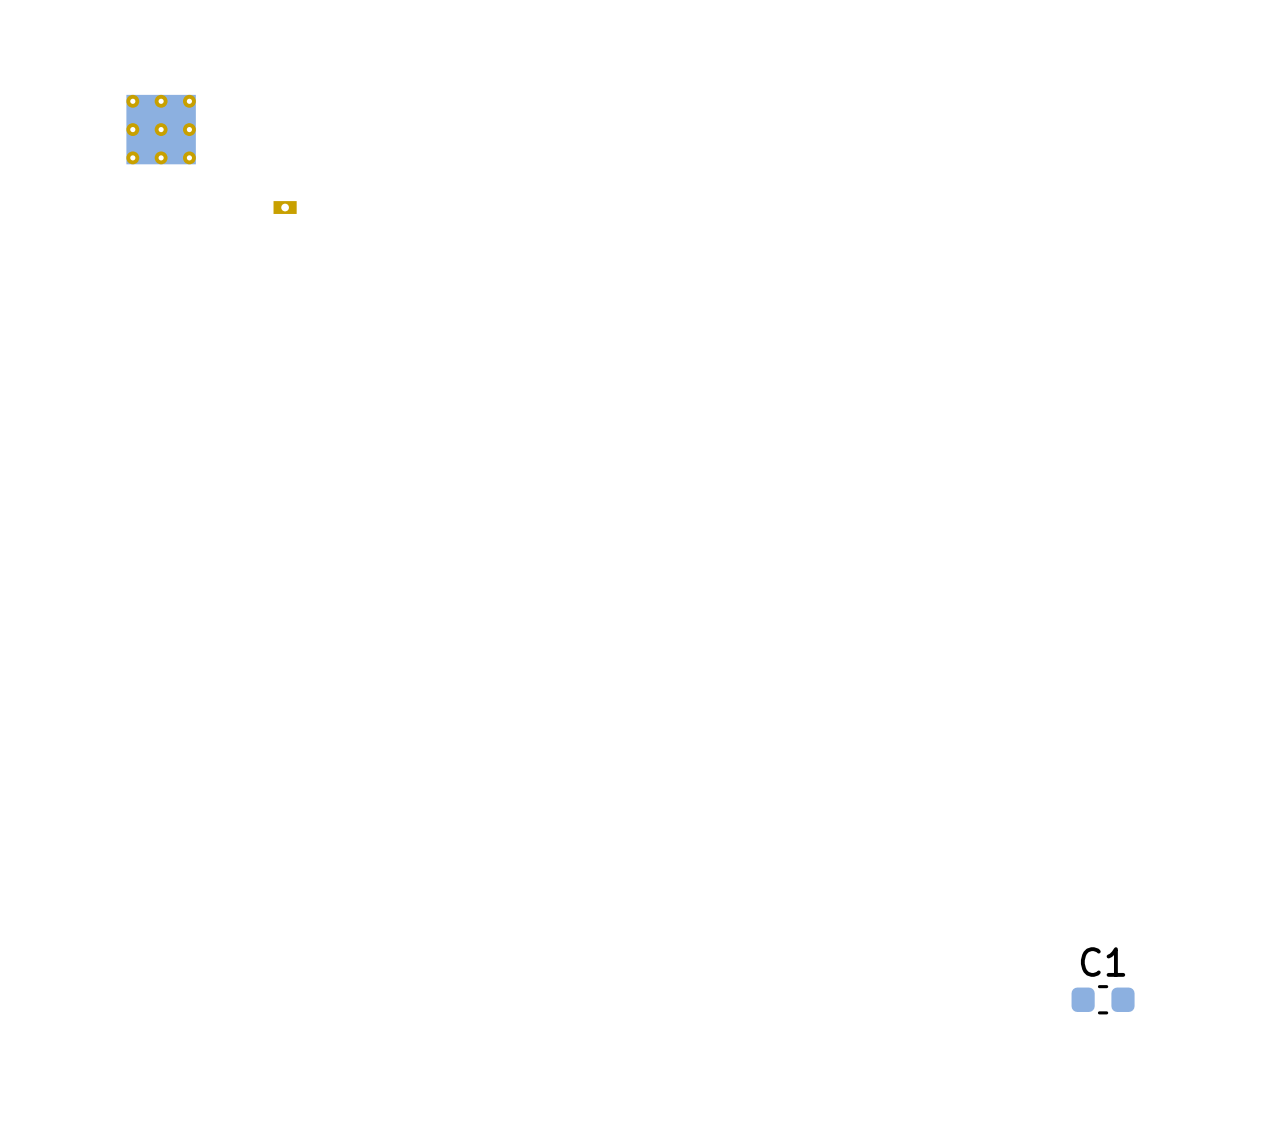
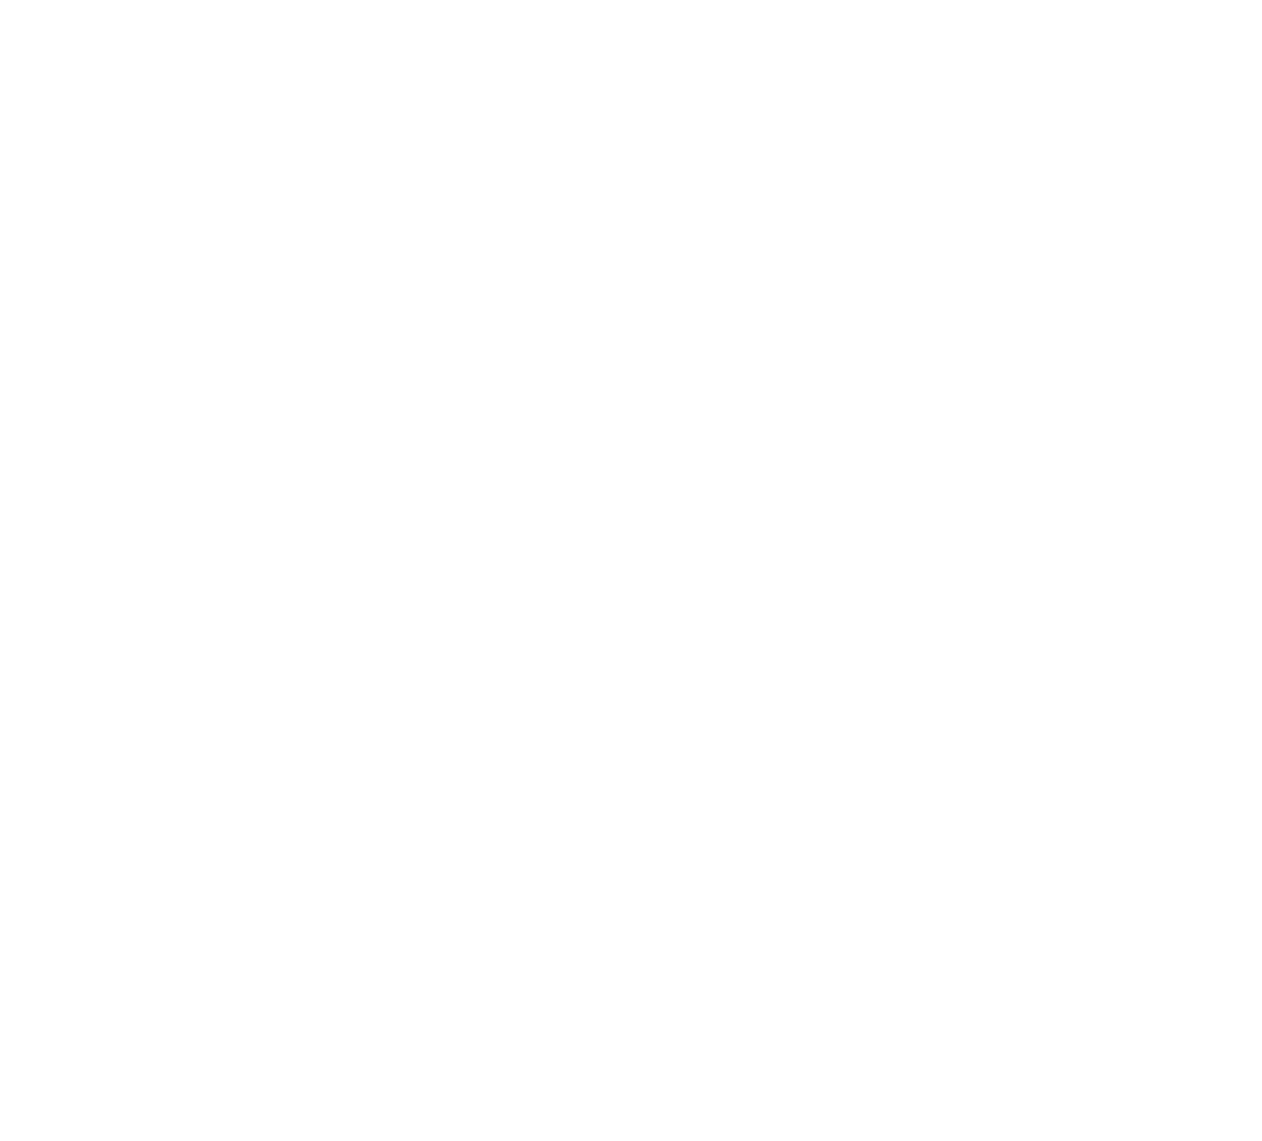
part: (161, 129) -> none
part: (285, 207) -> none
C1: (1103, 999) -> none

